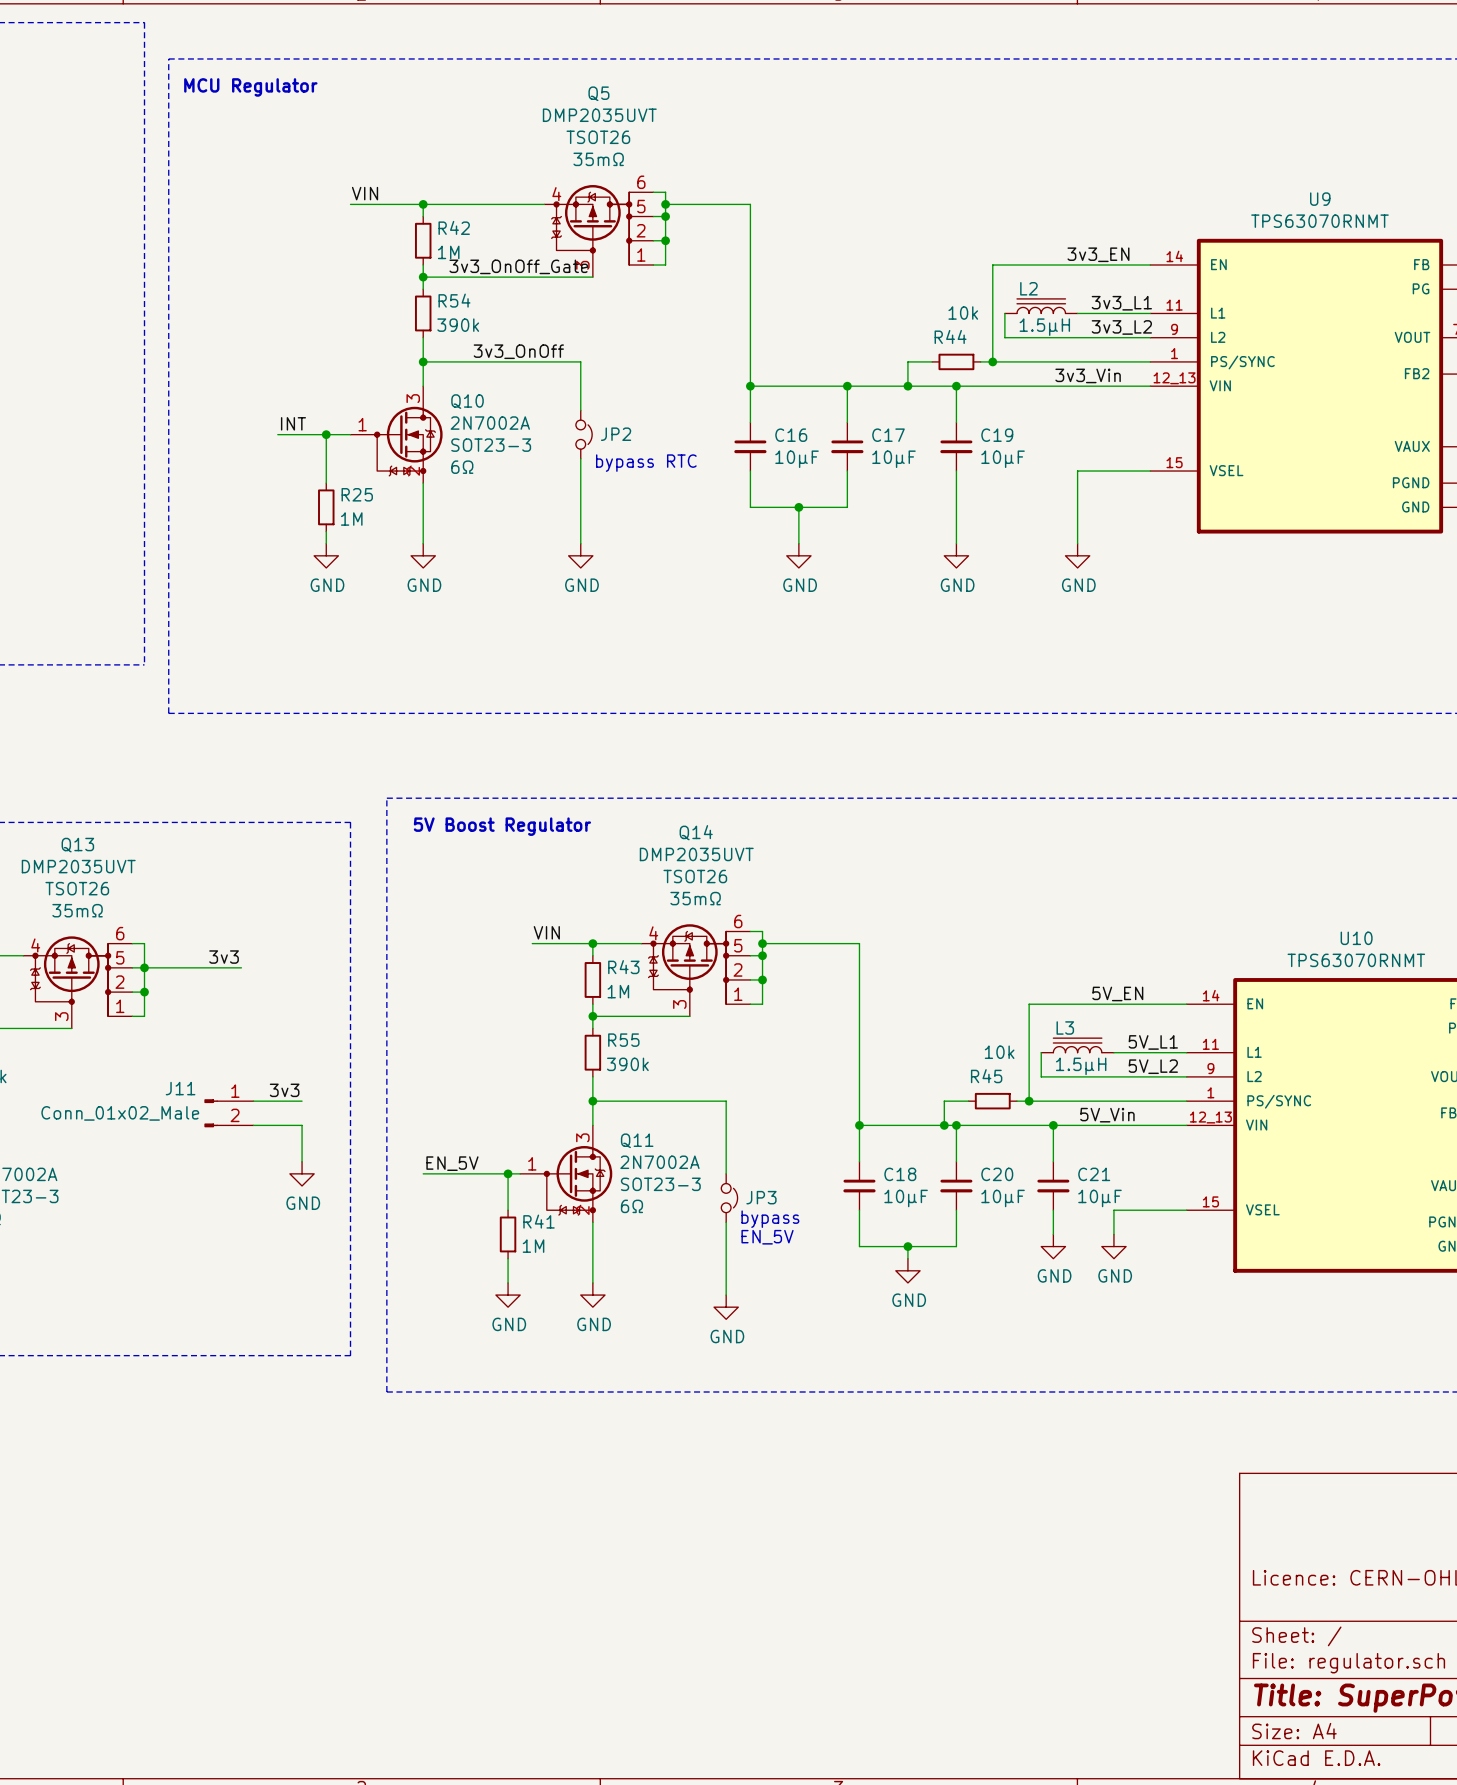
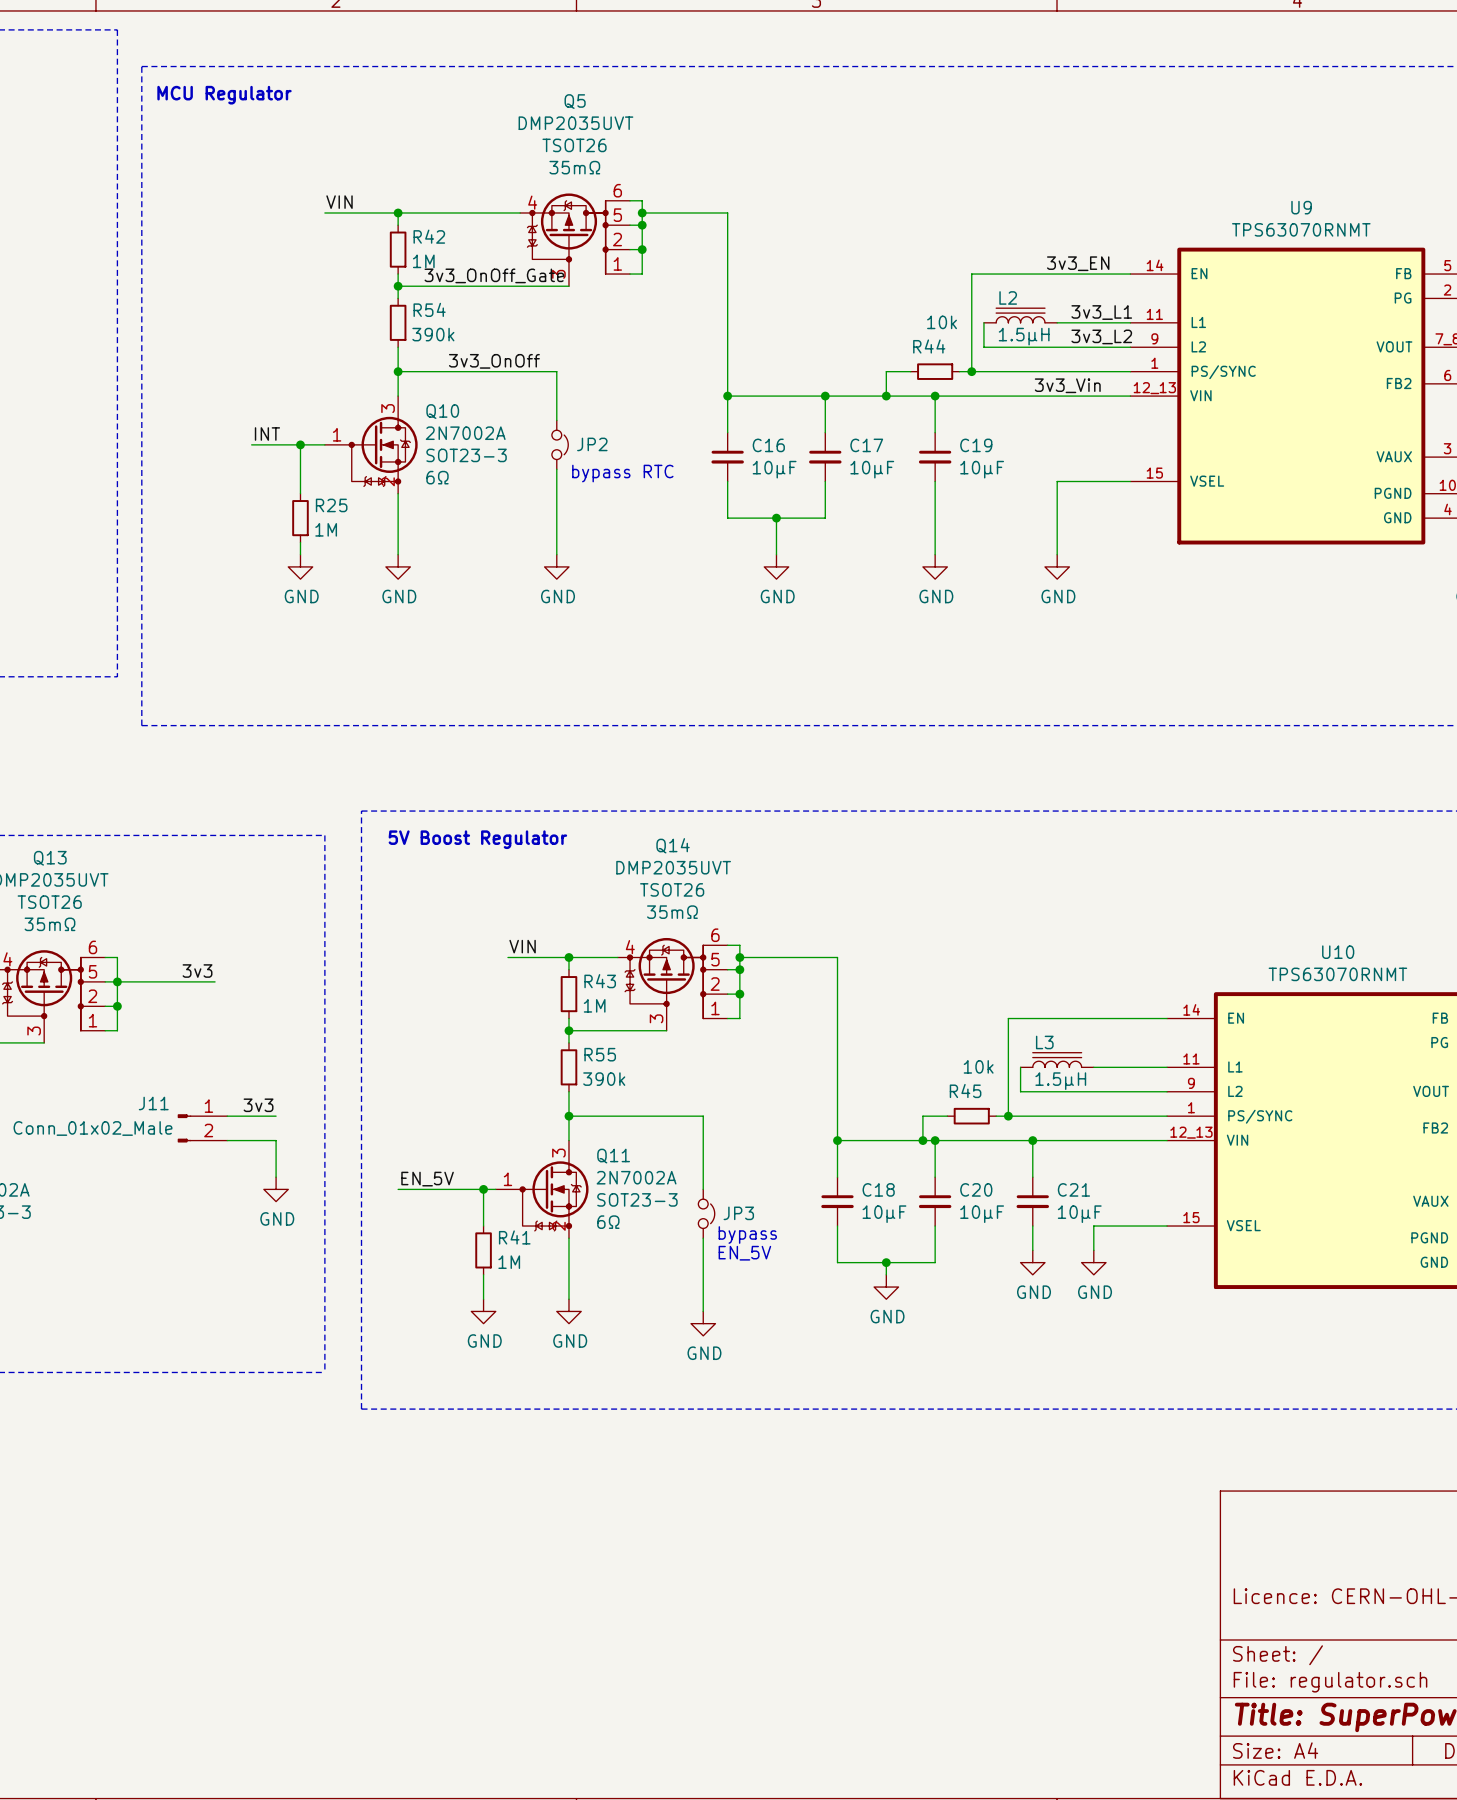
label: 5V_EN (1117, 993) -> none
label: 5V_L1 (1153, 1042) -> none
label: 5V_L2 (1153, 1066) -> none
label: 5V_Vin (1107, 1115) -> none

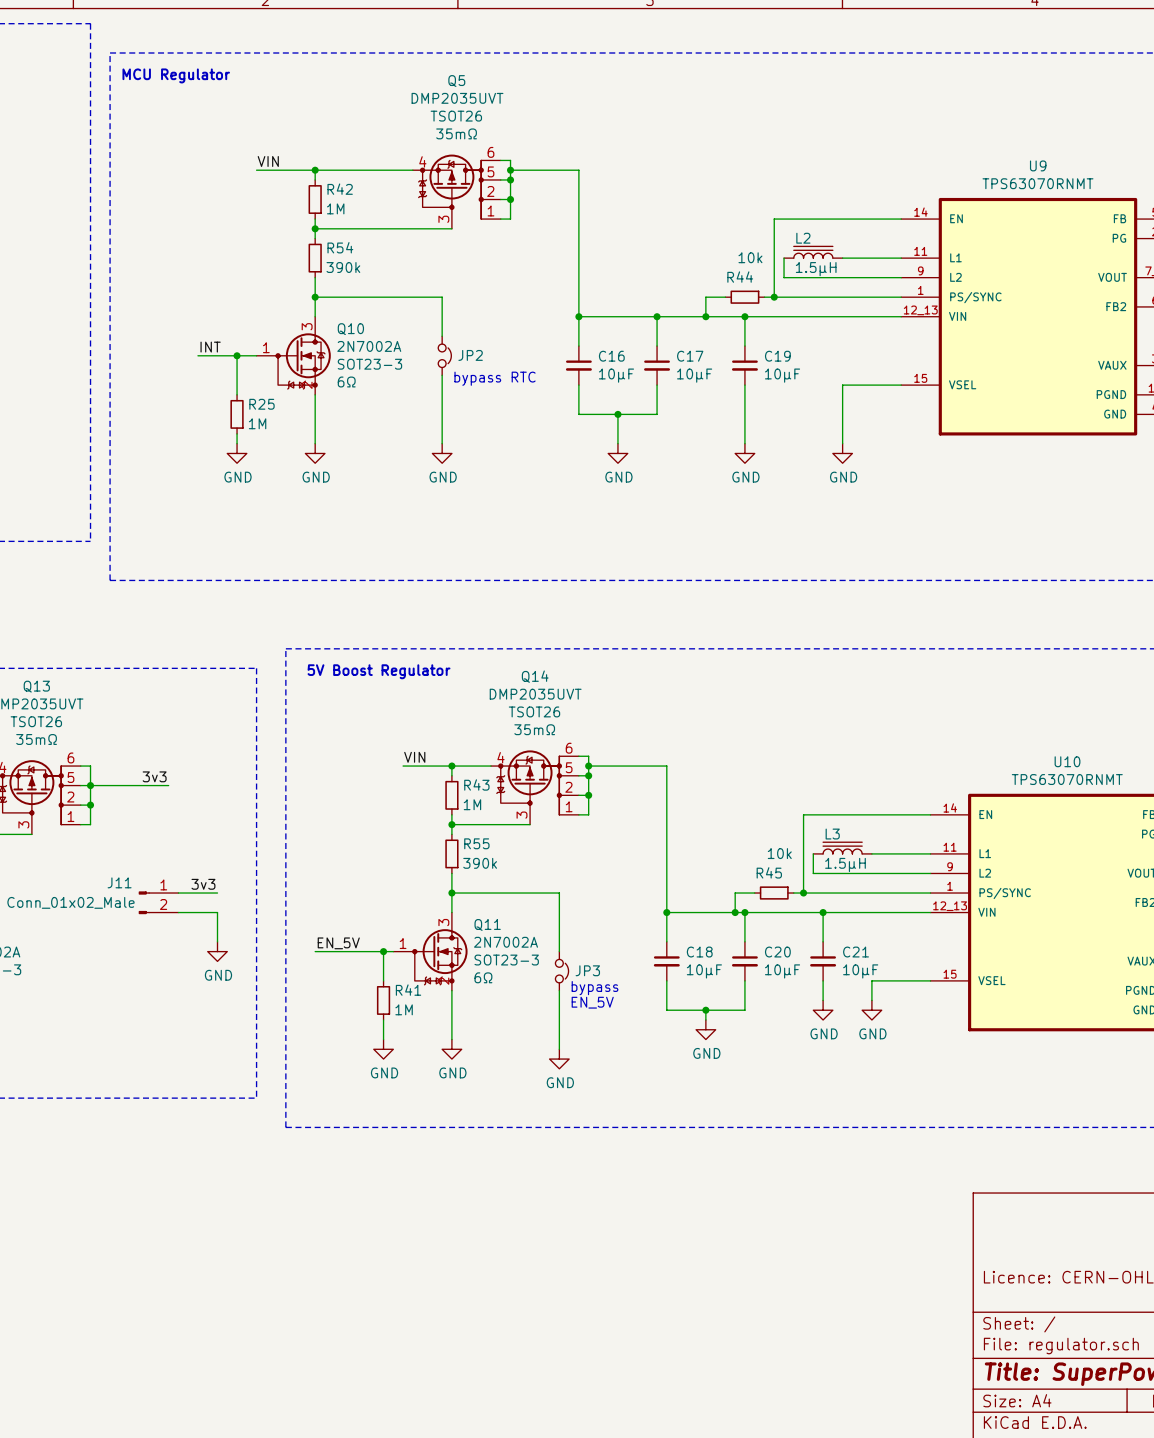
label: 3v3_EN (1078, 263) -> none
label: 3v3_OnOff_Gate (494, 275) -> none
label: 3v3_L1 (1101, 312) -> none
label: 3v3_L2 (1101, 336) -> none
label: 3v3_OnOff (494, 361) -> none
label: 3v3_Vin (1067, 385) -> none

